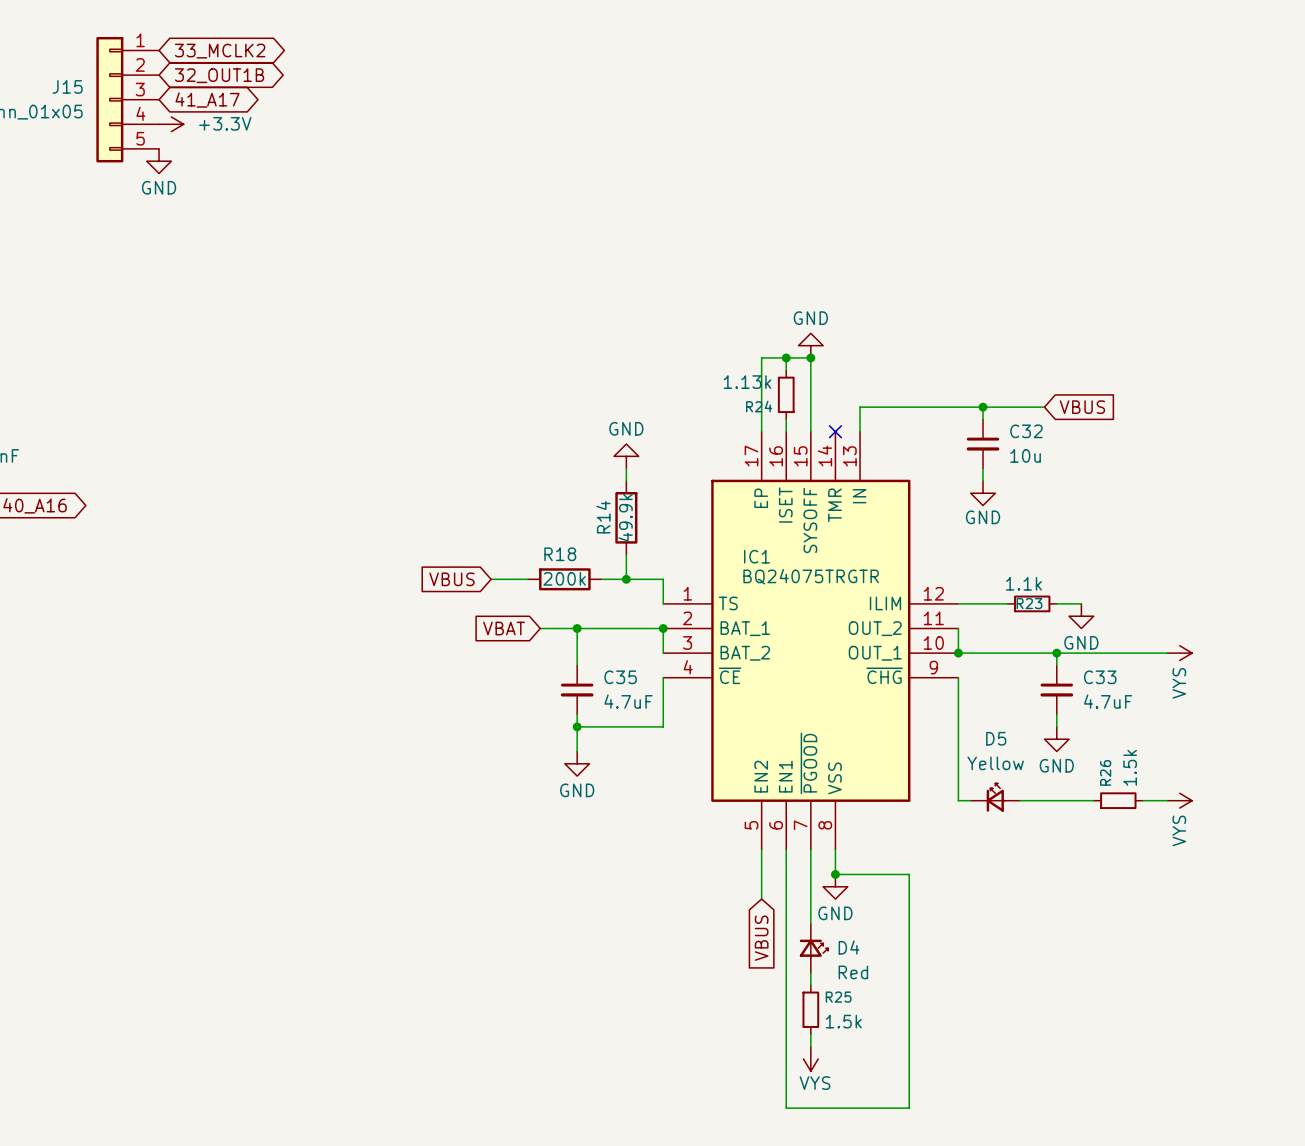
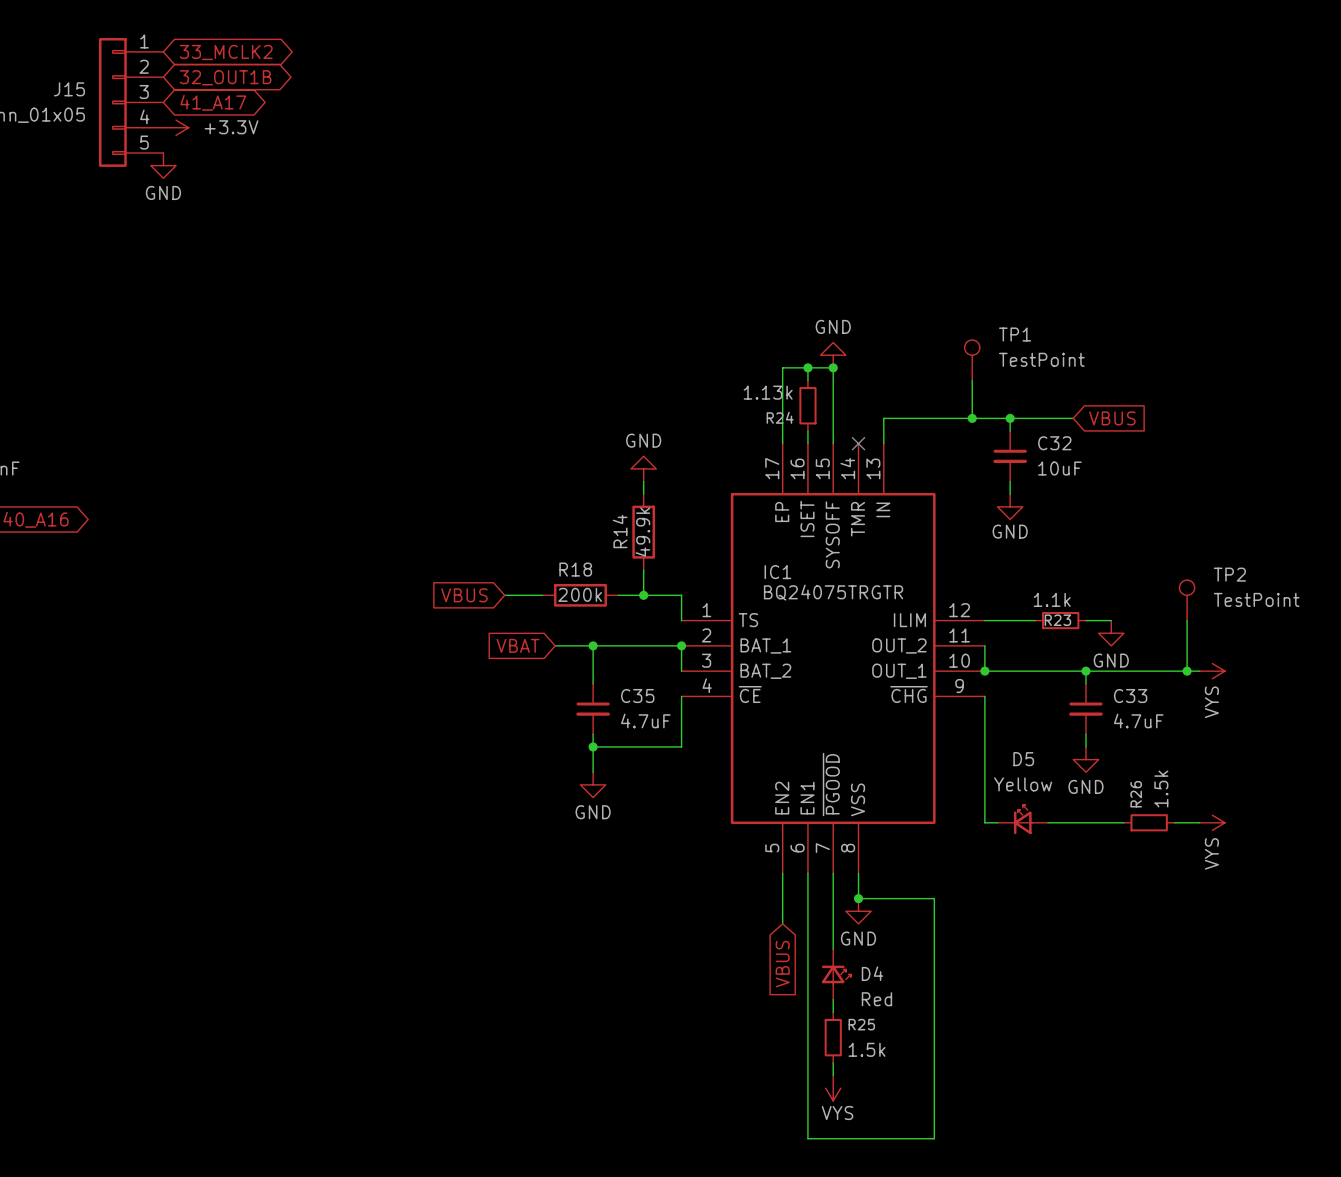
TP1: none -> TestPoint (972, 360)
wire: none -> (972, 380) (972, 418)
junction: none -> (972, 418)
C32 value: 10u (1025, 455) -> 10uF (1059, 468)
TP2: none -> TestPoint (1187, 600)
wire: none -> (1187, 620) (1187, 671)
junction: none -> (1187, 671)

